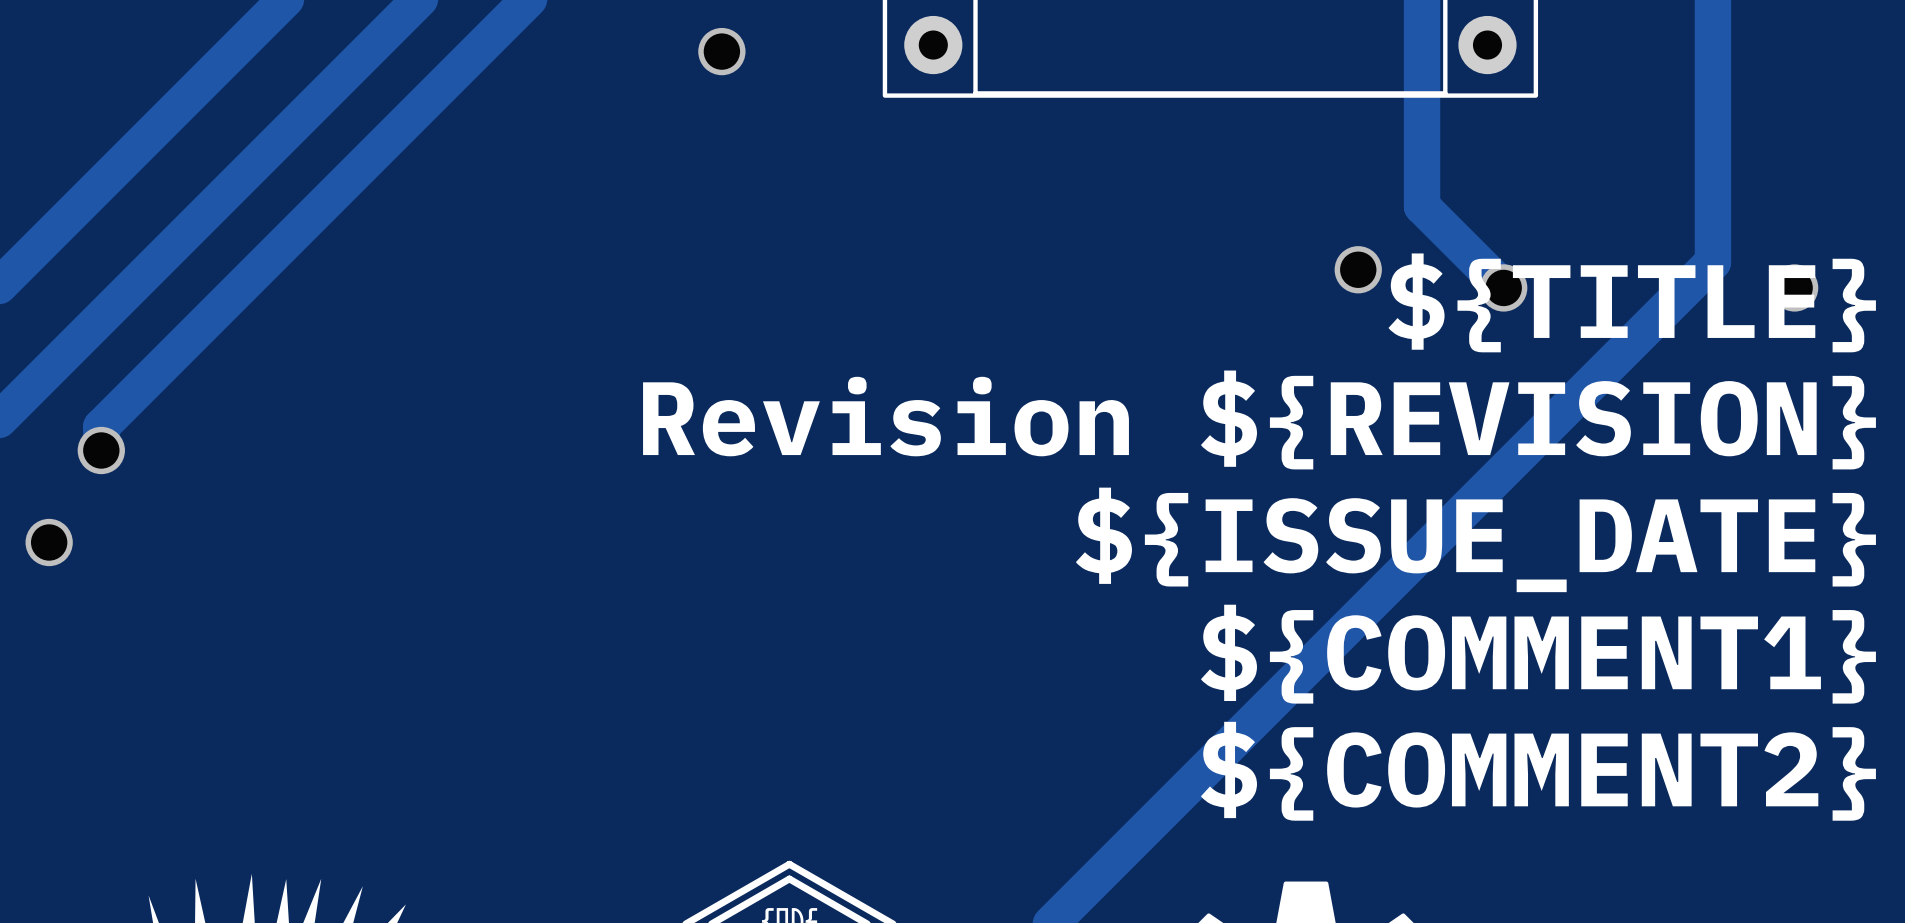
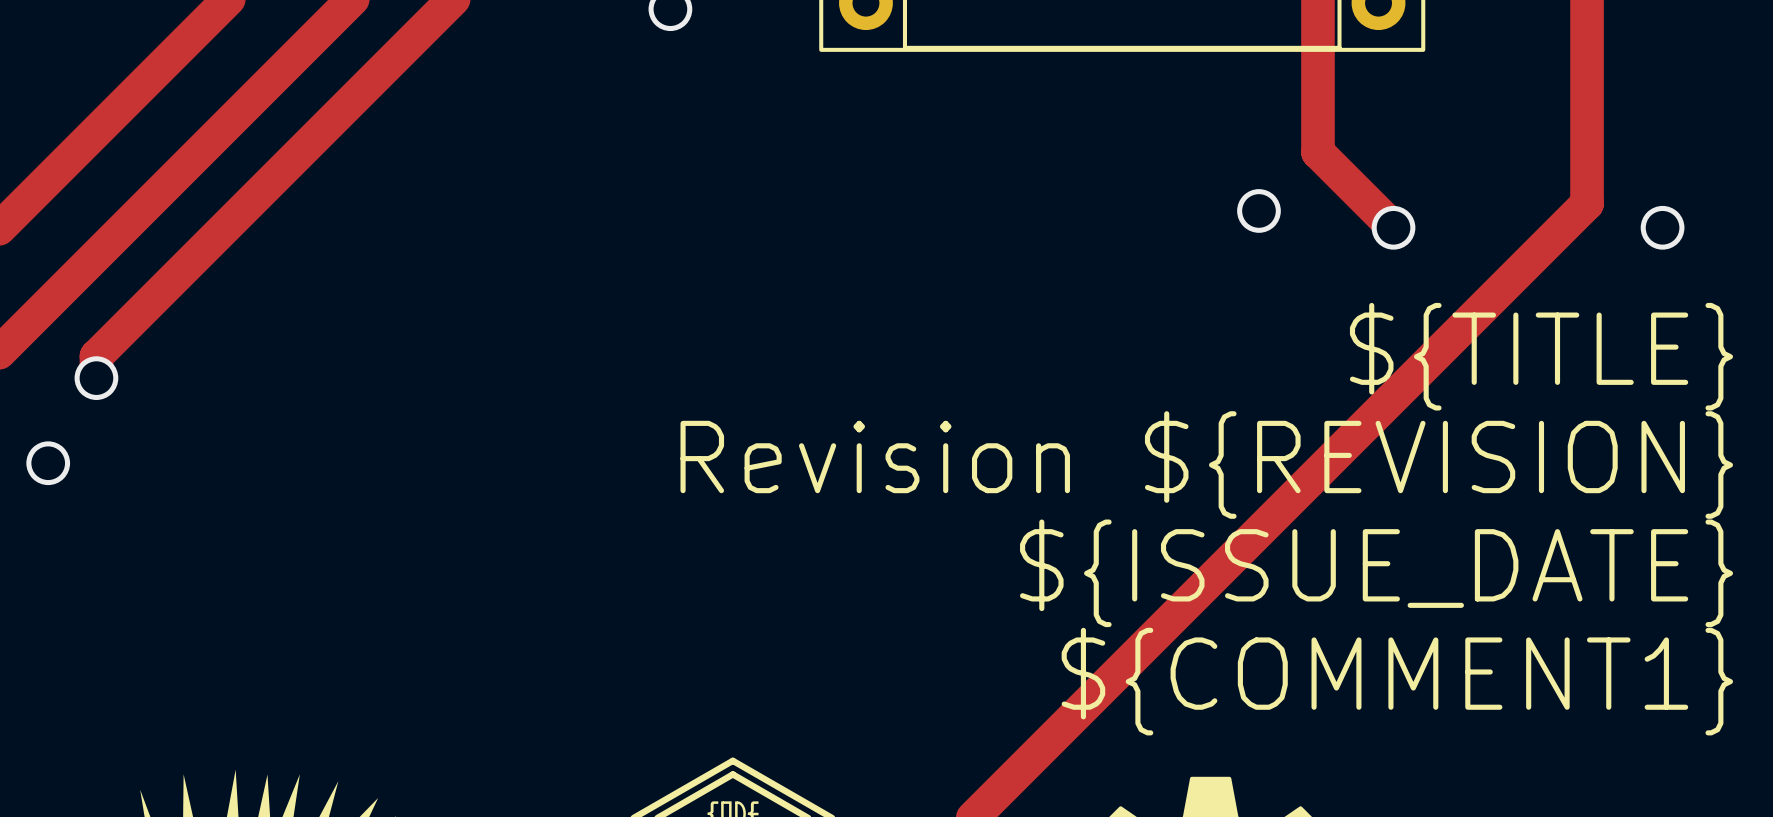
text: ${TITLE} (1632, 302) -> none
text: Revision ${REVISION} (1259, 419) -> ${TITLE} (1541, 356)
text: ${ISSUE_DATE} (1475, 539) -> Revision ${REVISION} (1206, 465)
text: ${COMMENT1} (1538, 654) -> ${ISSUE_DATE} (1376, 573)
text: ${COMMENT2} (1538, 771) -> ${COMMENT1} (1397, 681)

